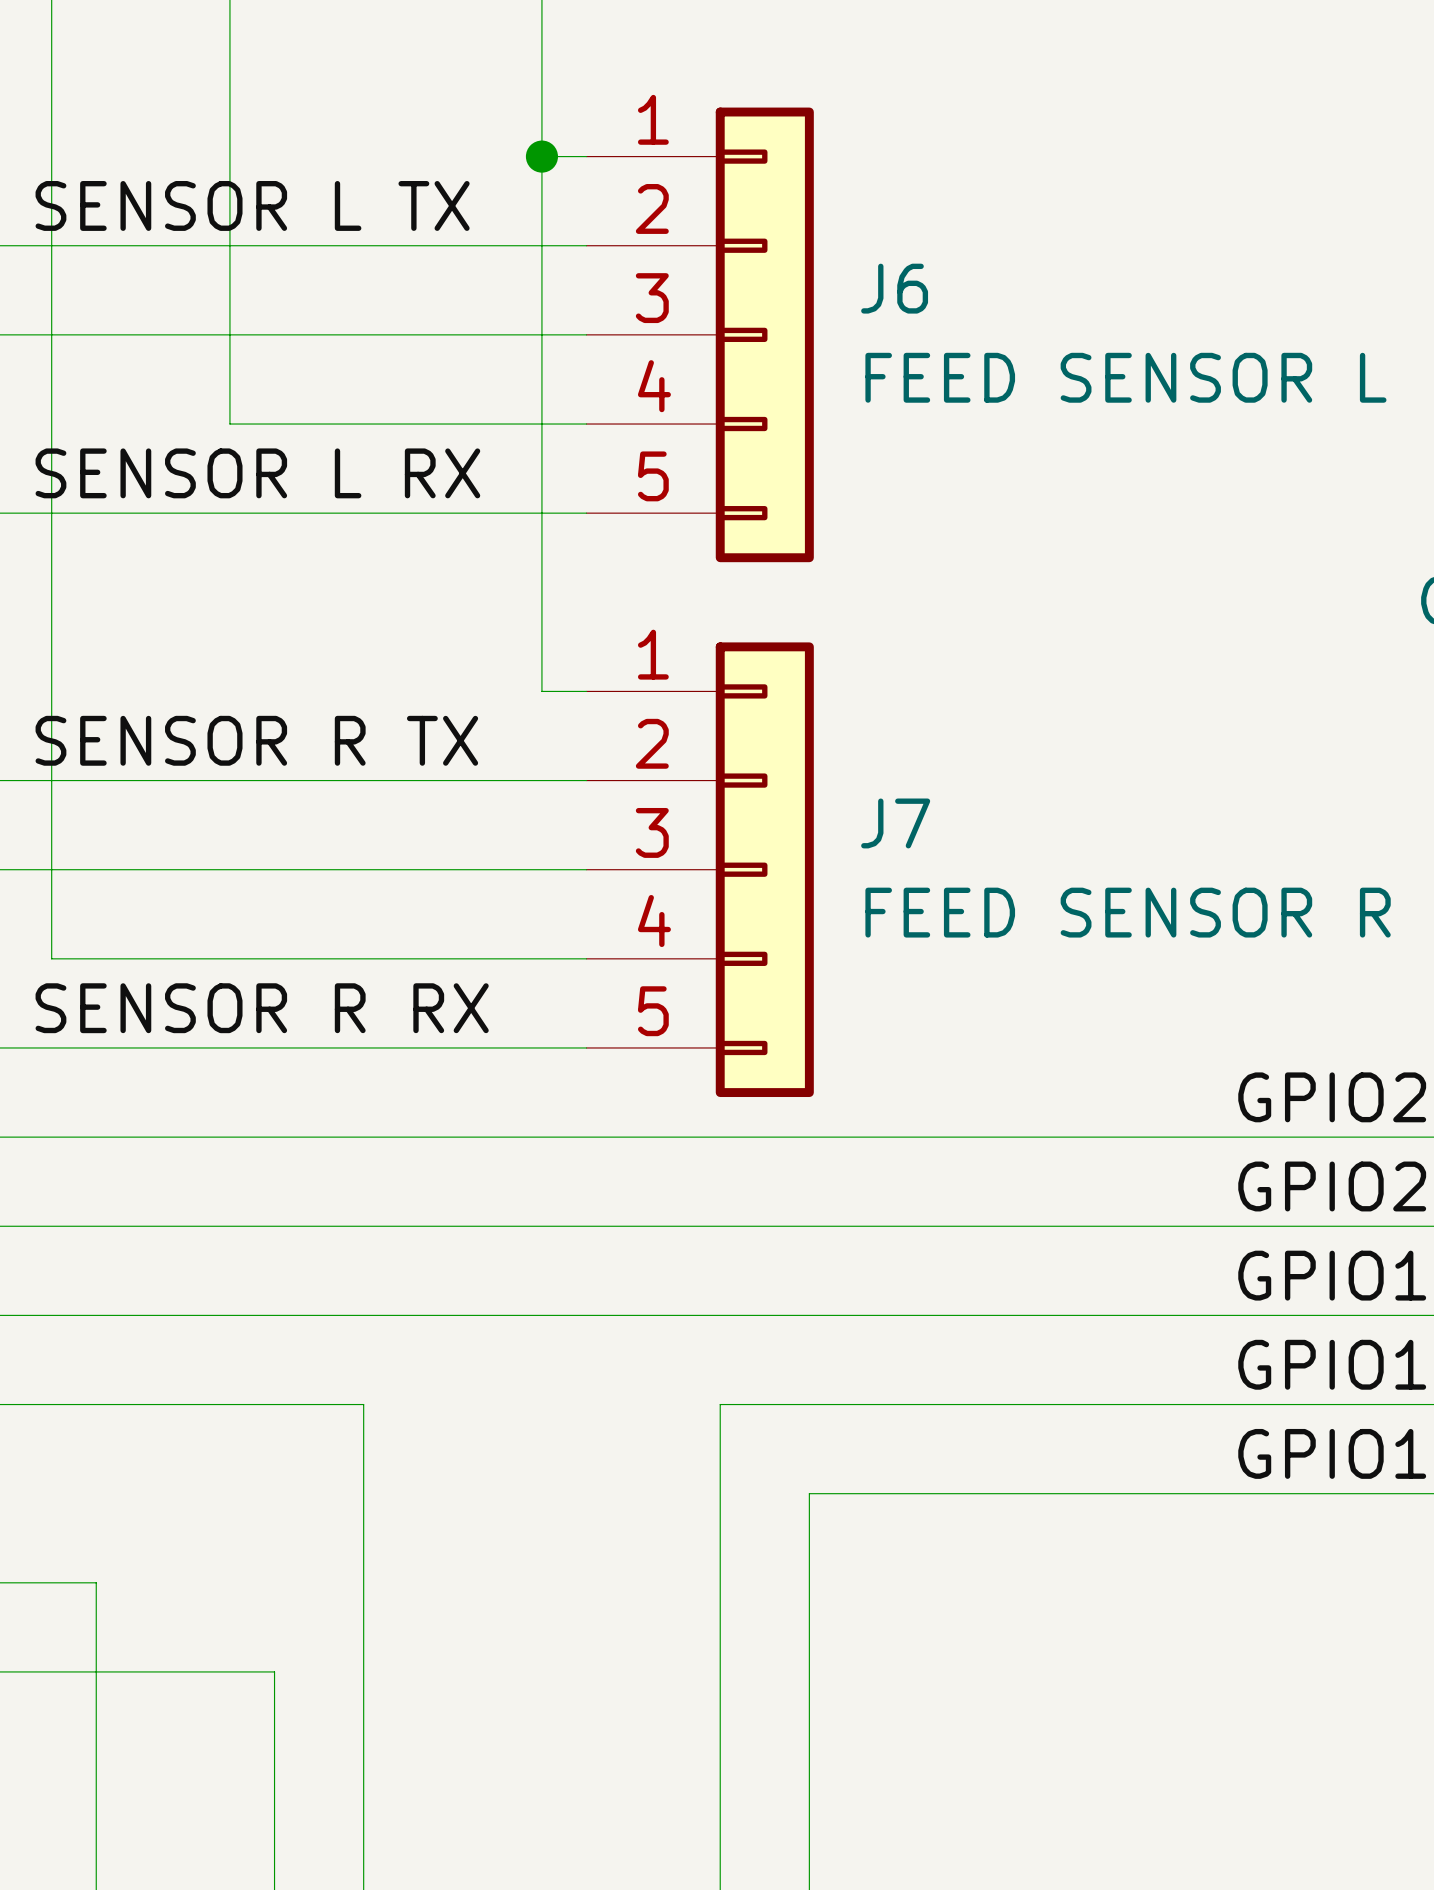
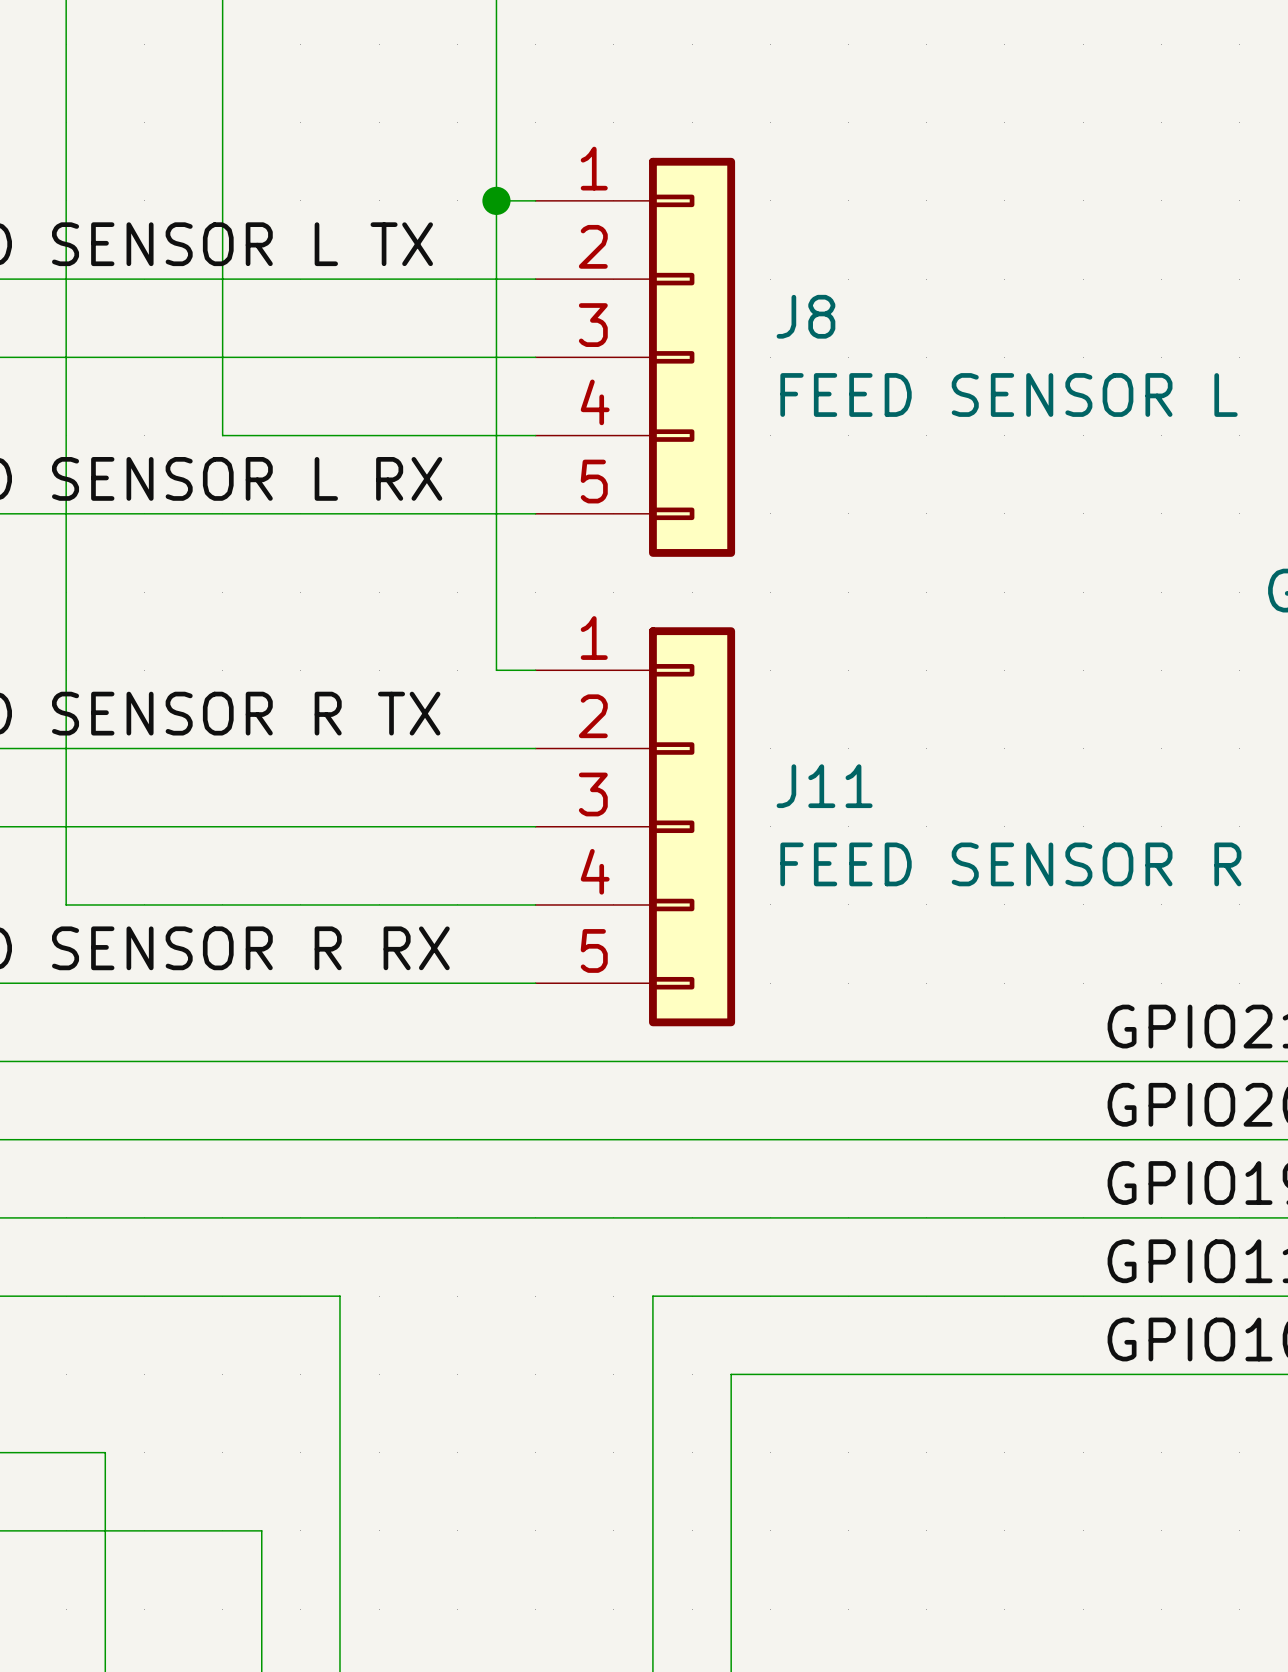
J6 name: J6 (894, 288) -> J8 (805, 316)
J7 name: J7 (895, 823) -> J11 (824, 786)

